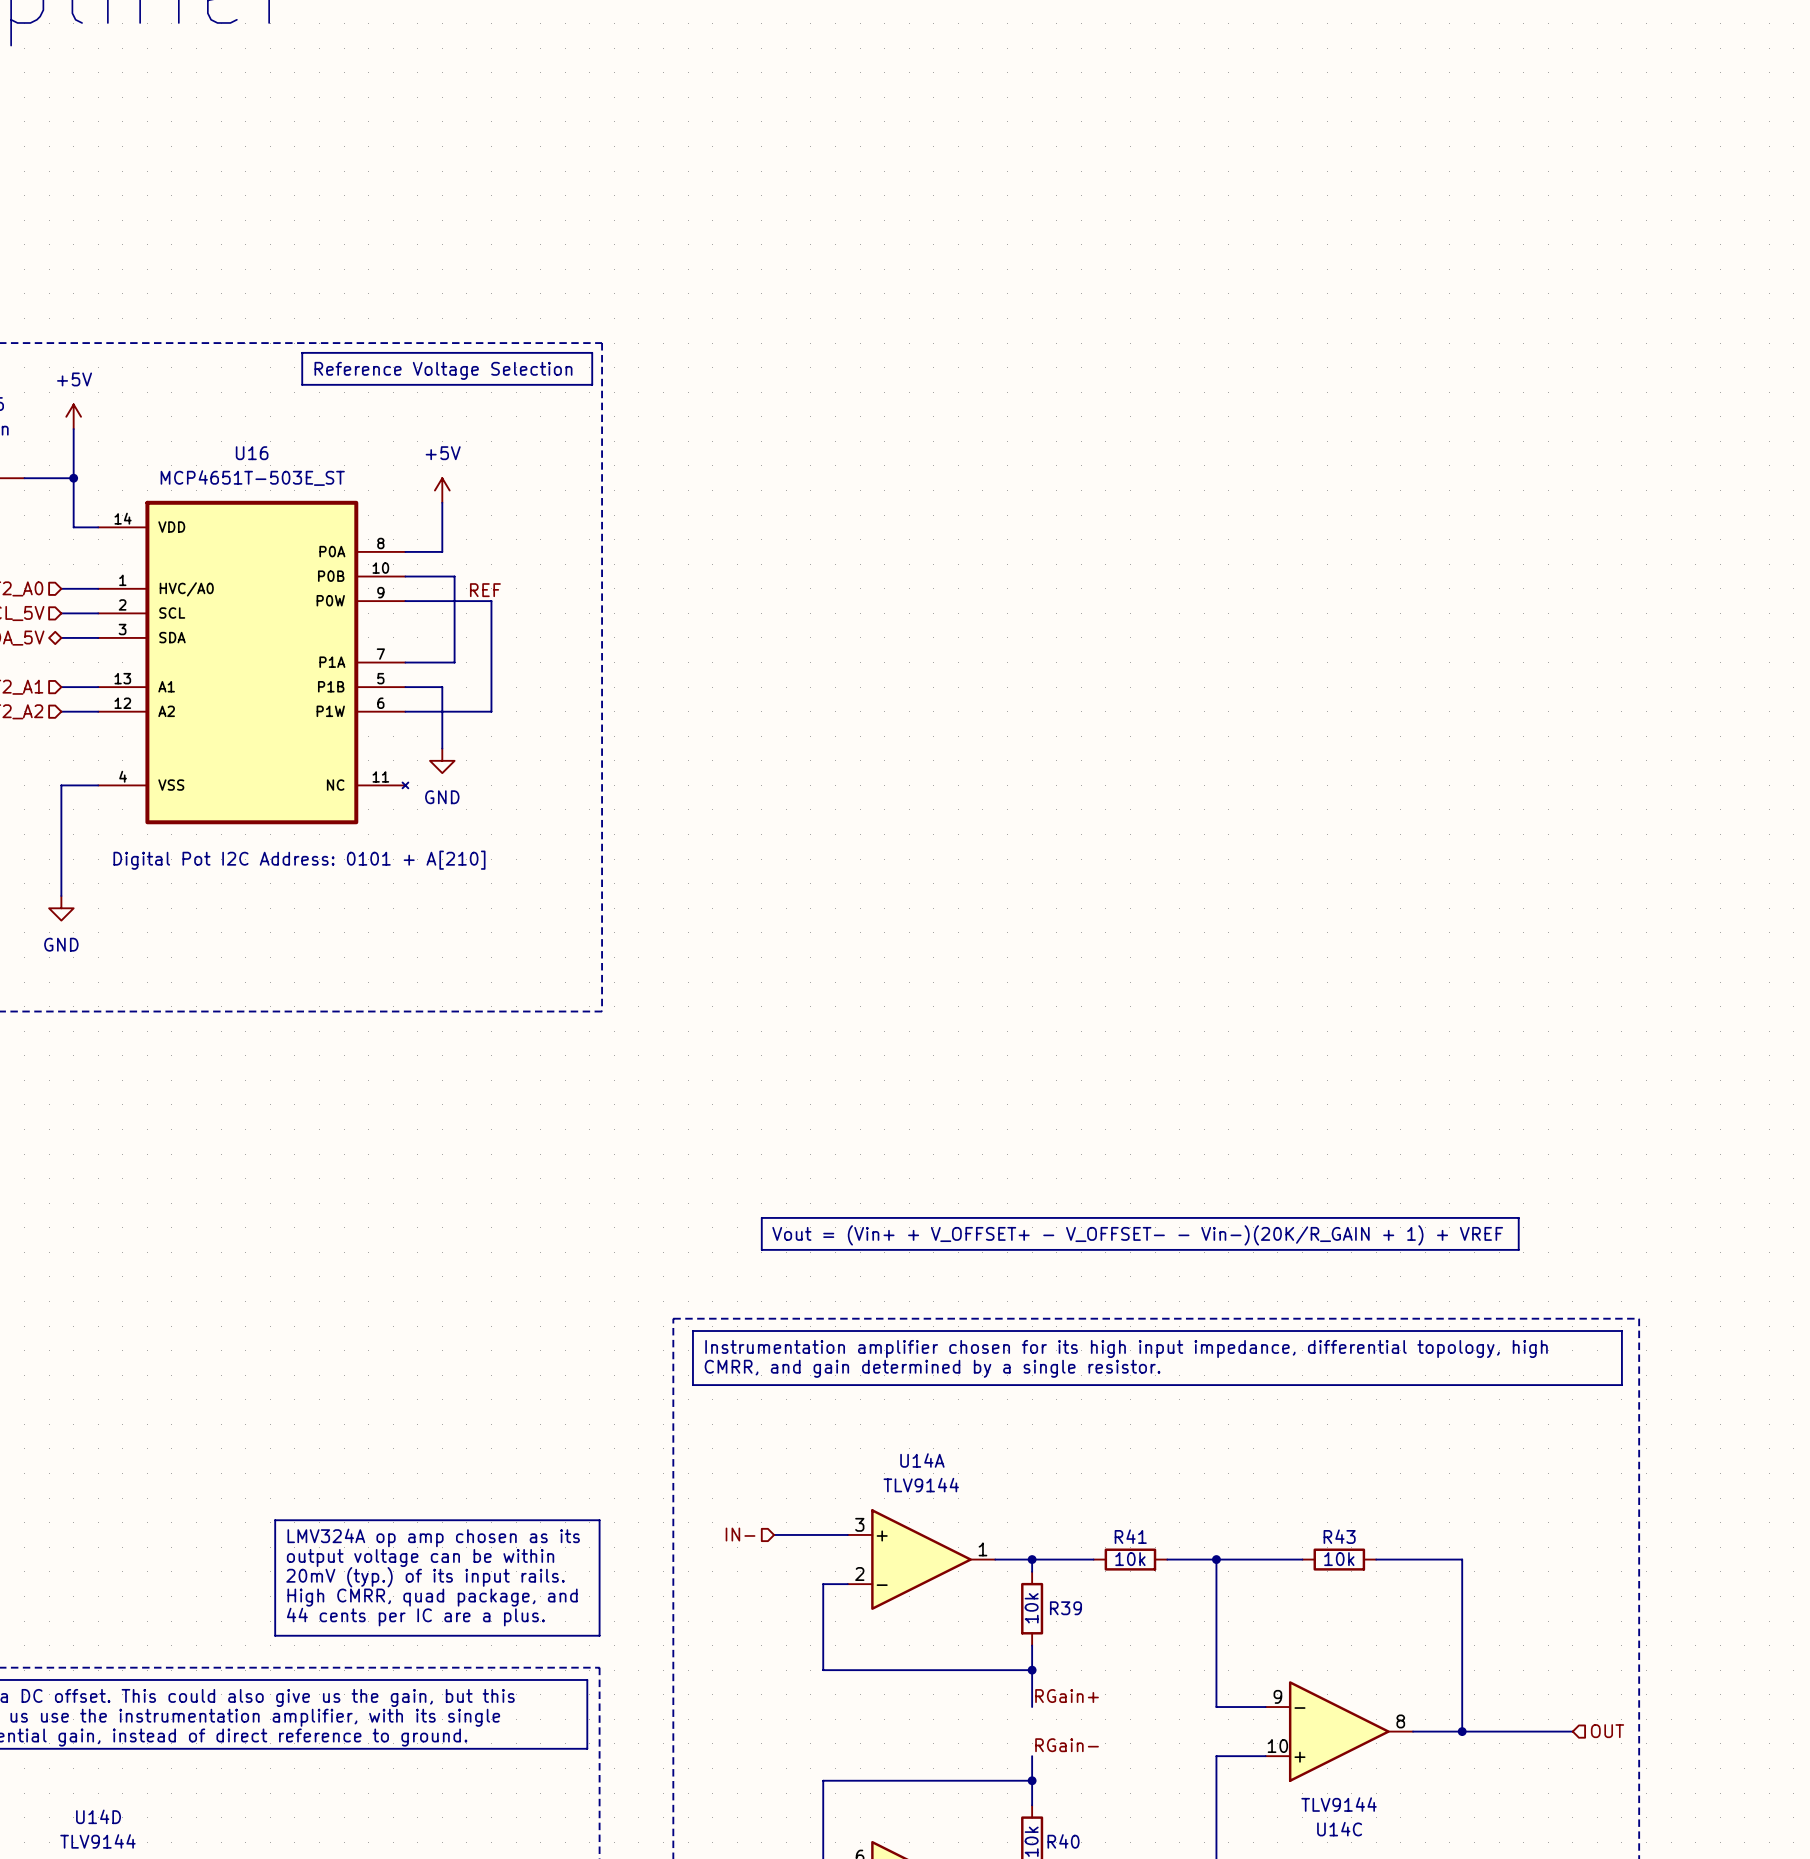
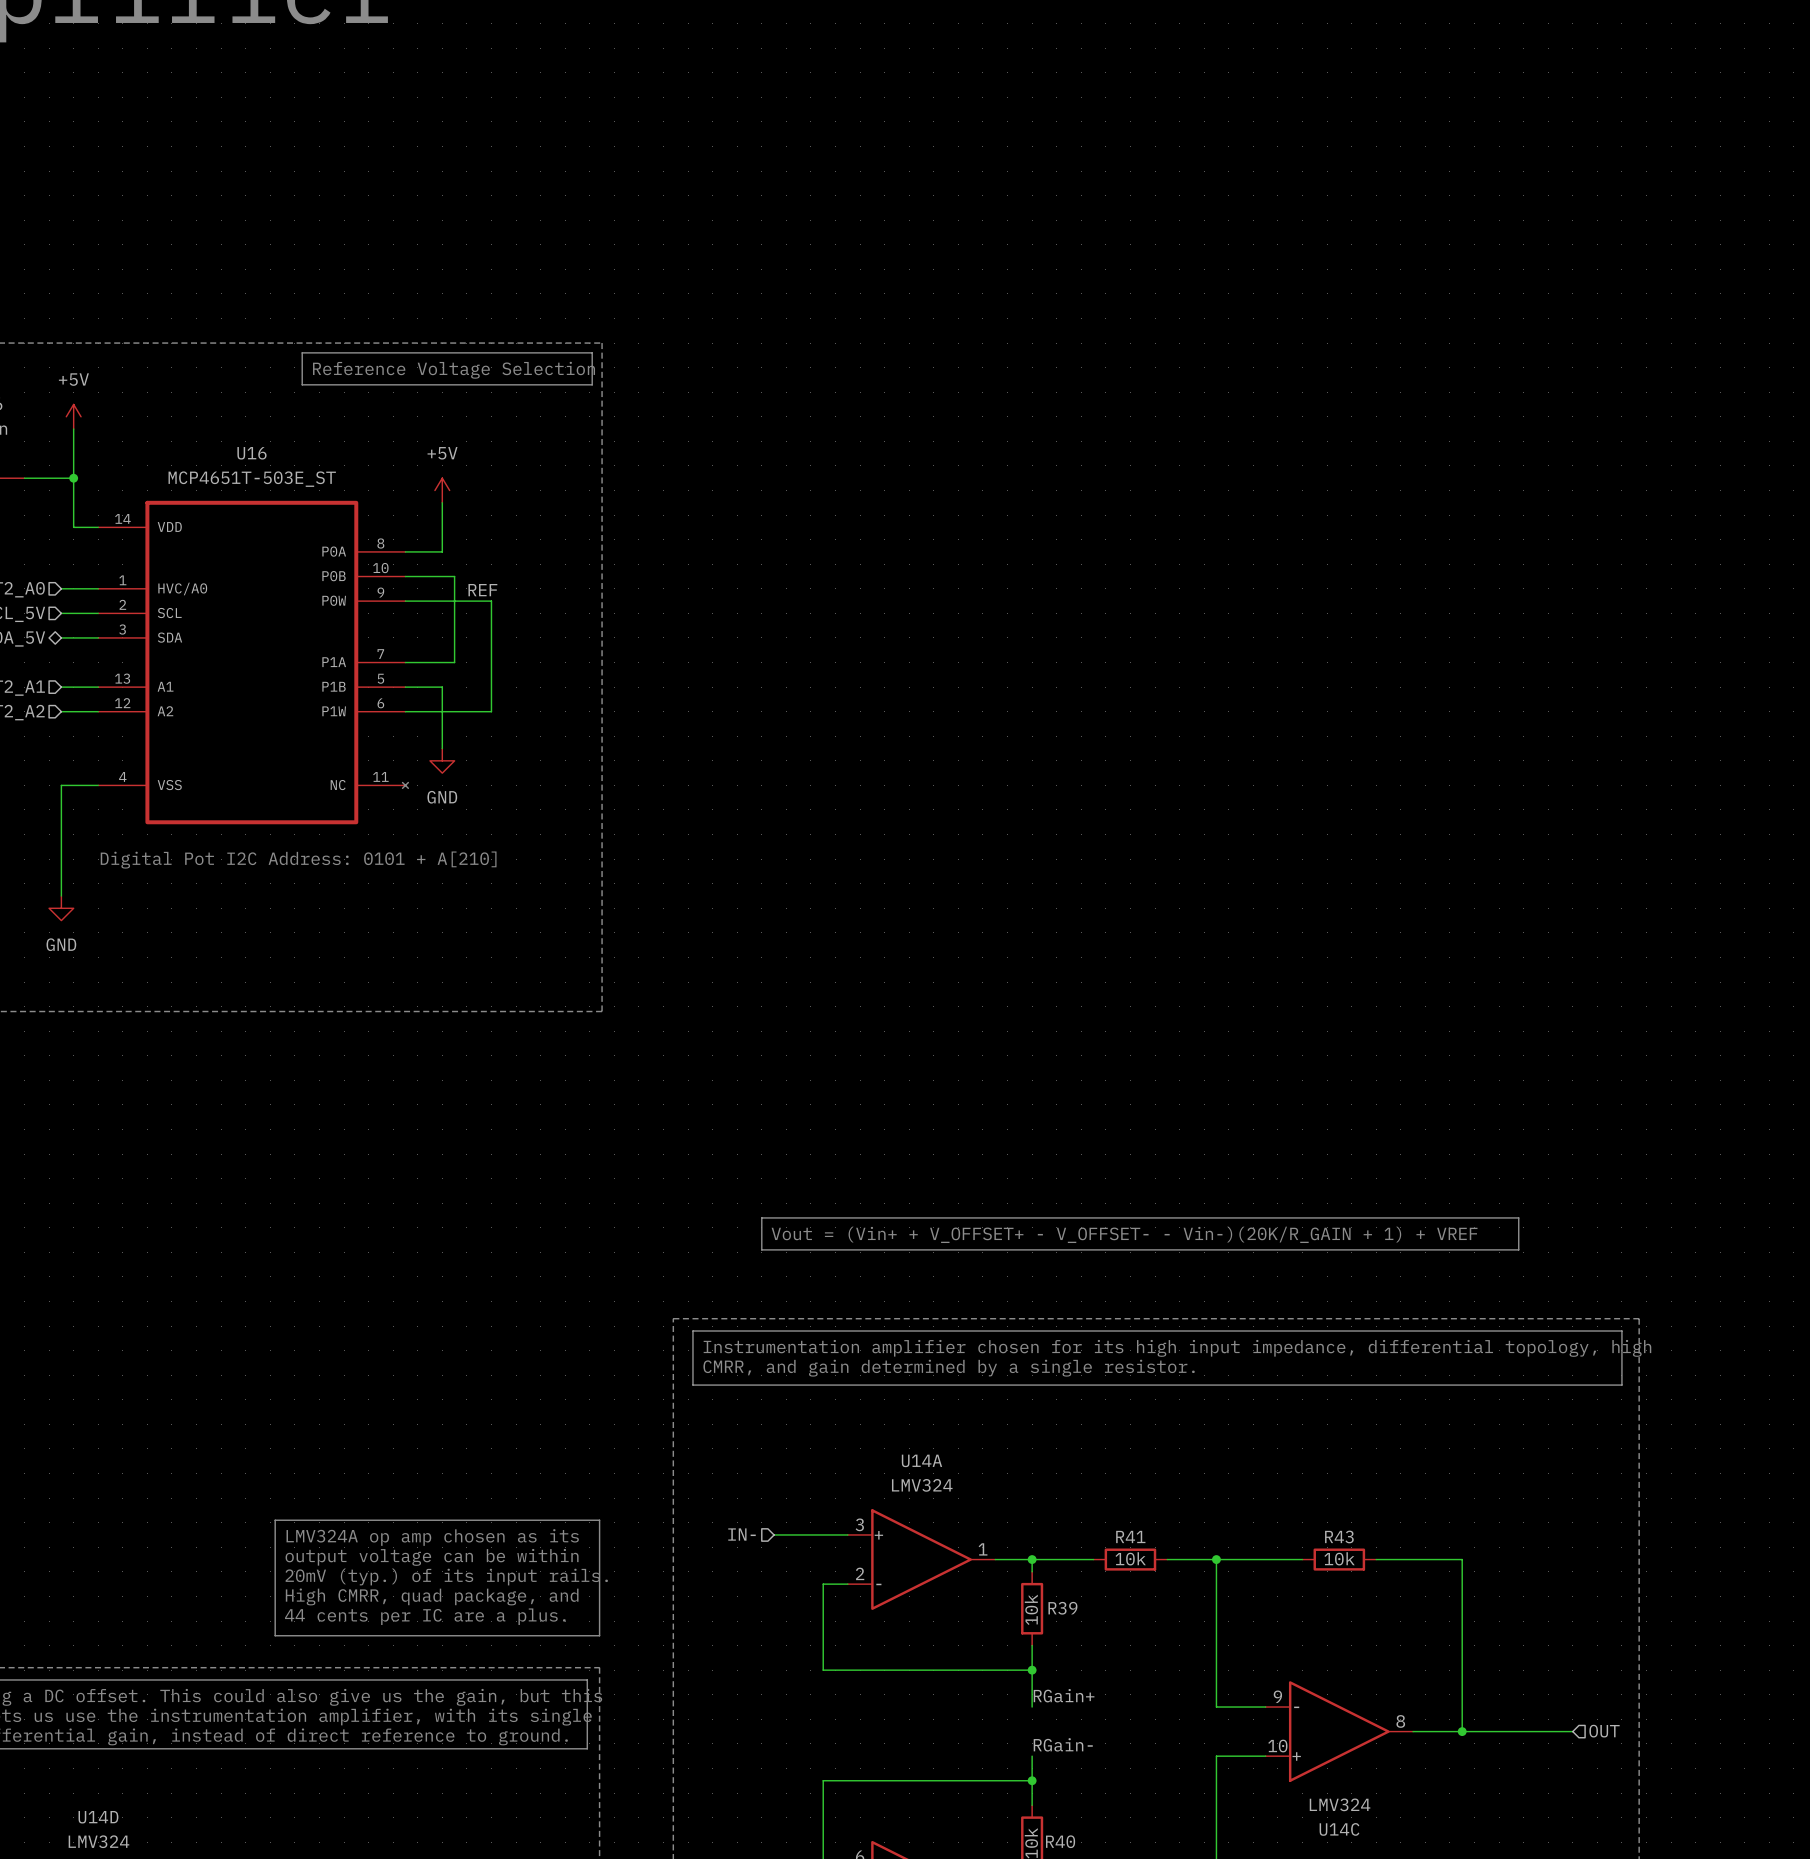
U14A value: TLV9144 (921, 1485) -> LMV324 (922, 1485)
U14C value: TLV9144 (1339, 1804) -> LMV324 (1340, 1804)
U14D value: TLV9144 (97, 1841) -> LMV324 (98, 1841)

